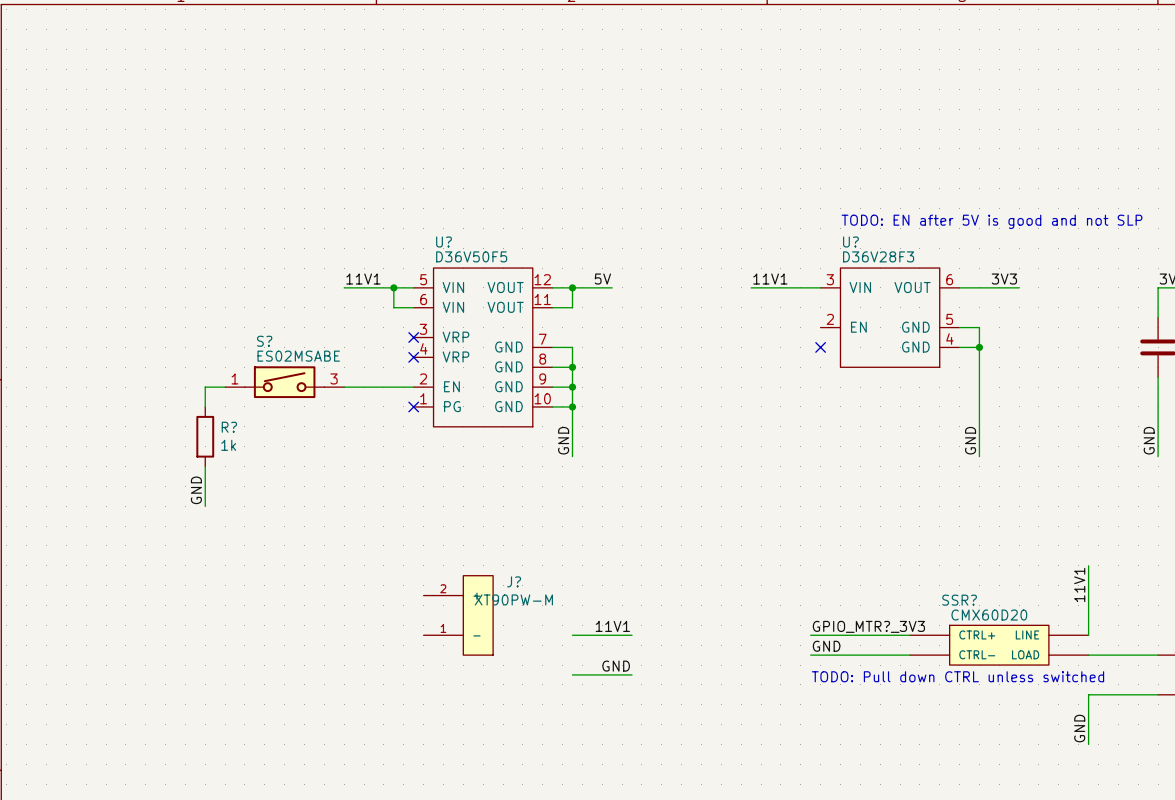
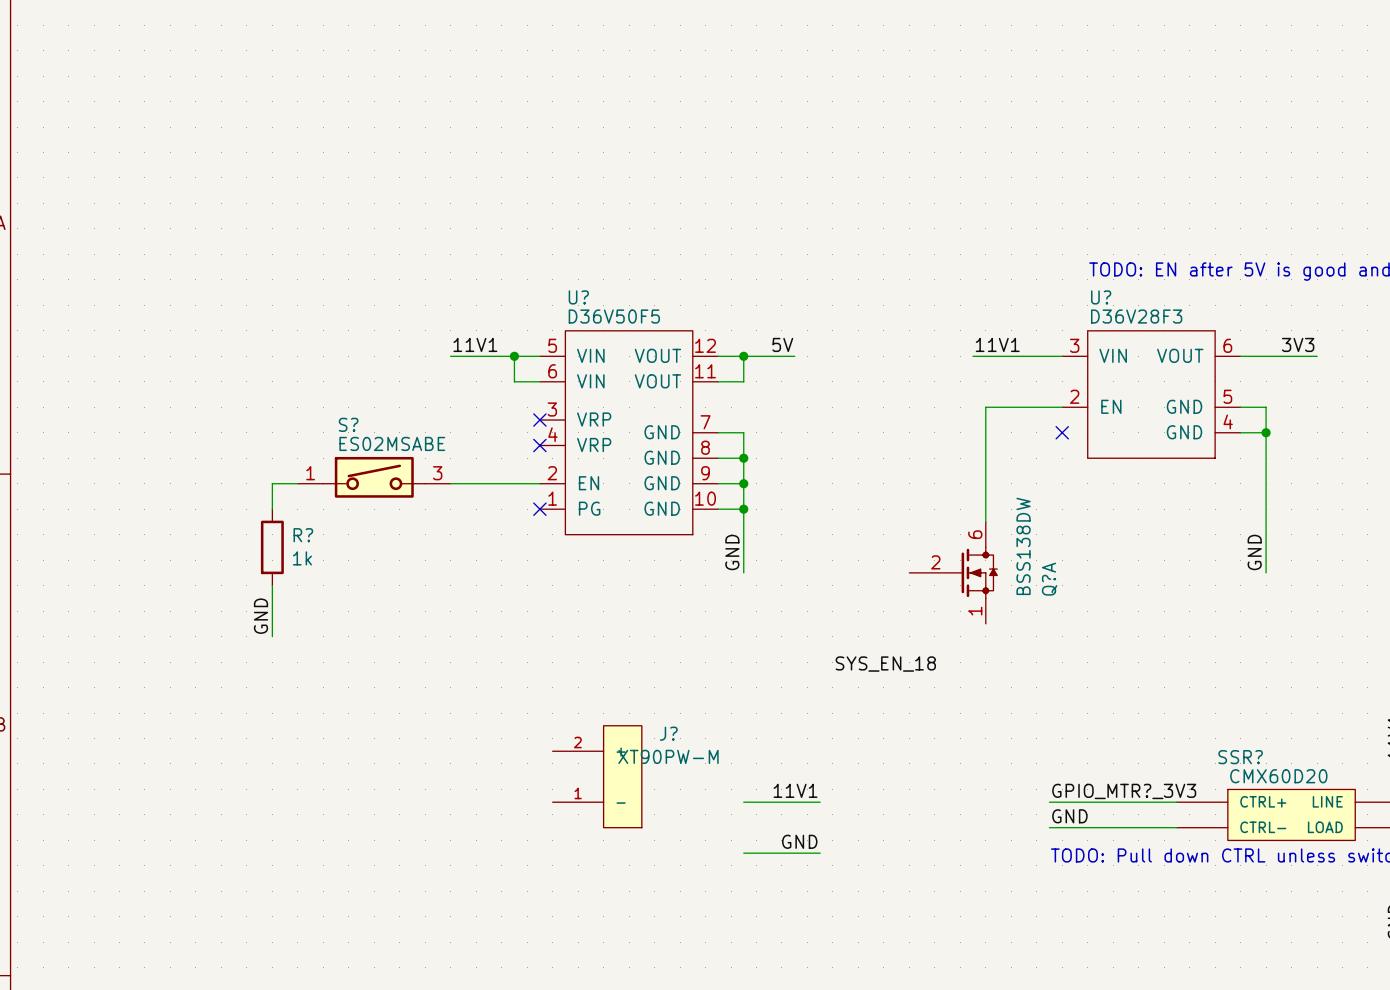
wire: none -> (1062, 407) (985, 407) (985, 521)
Q?A: none -> BSS138DW (953, 572)
label: none -> SYS_EN_18 (885, 664)

